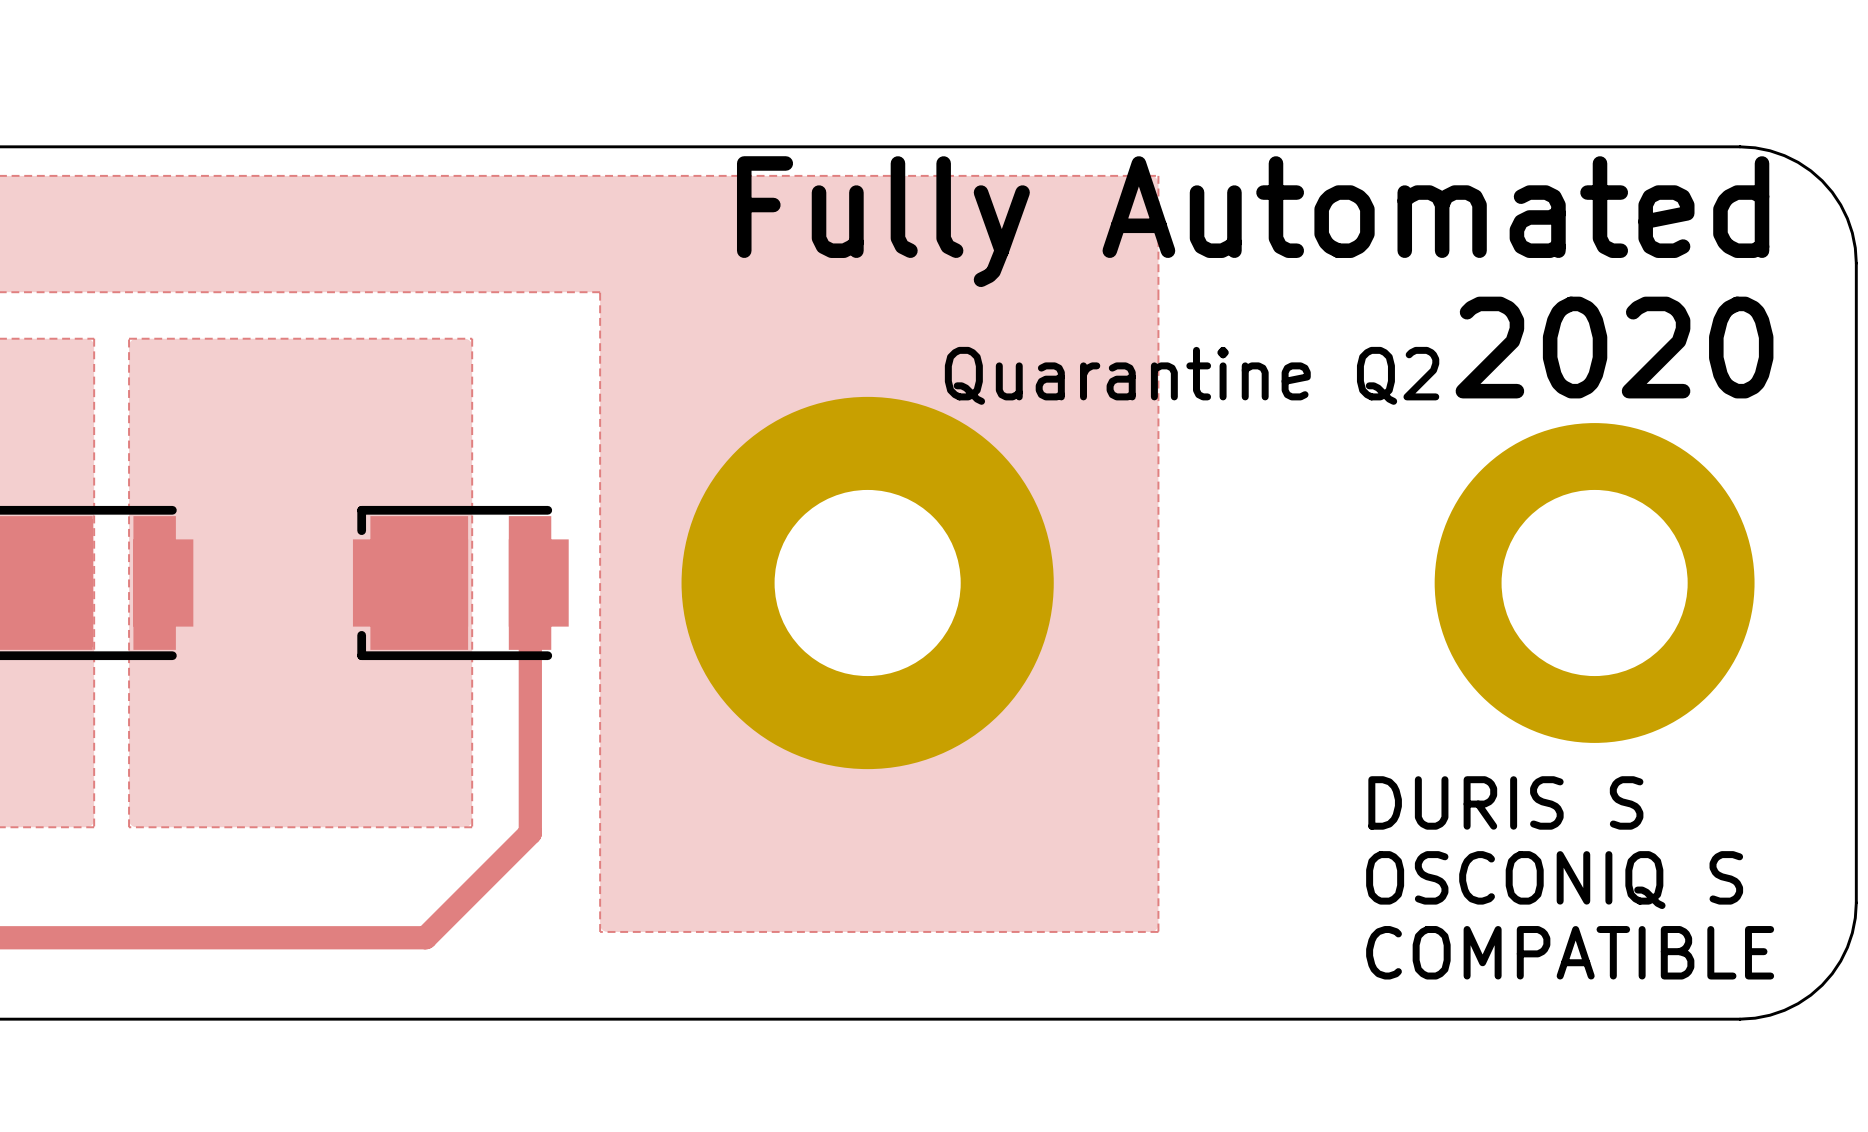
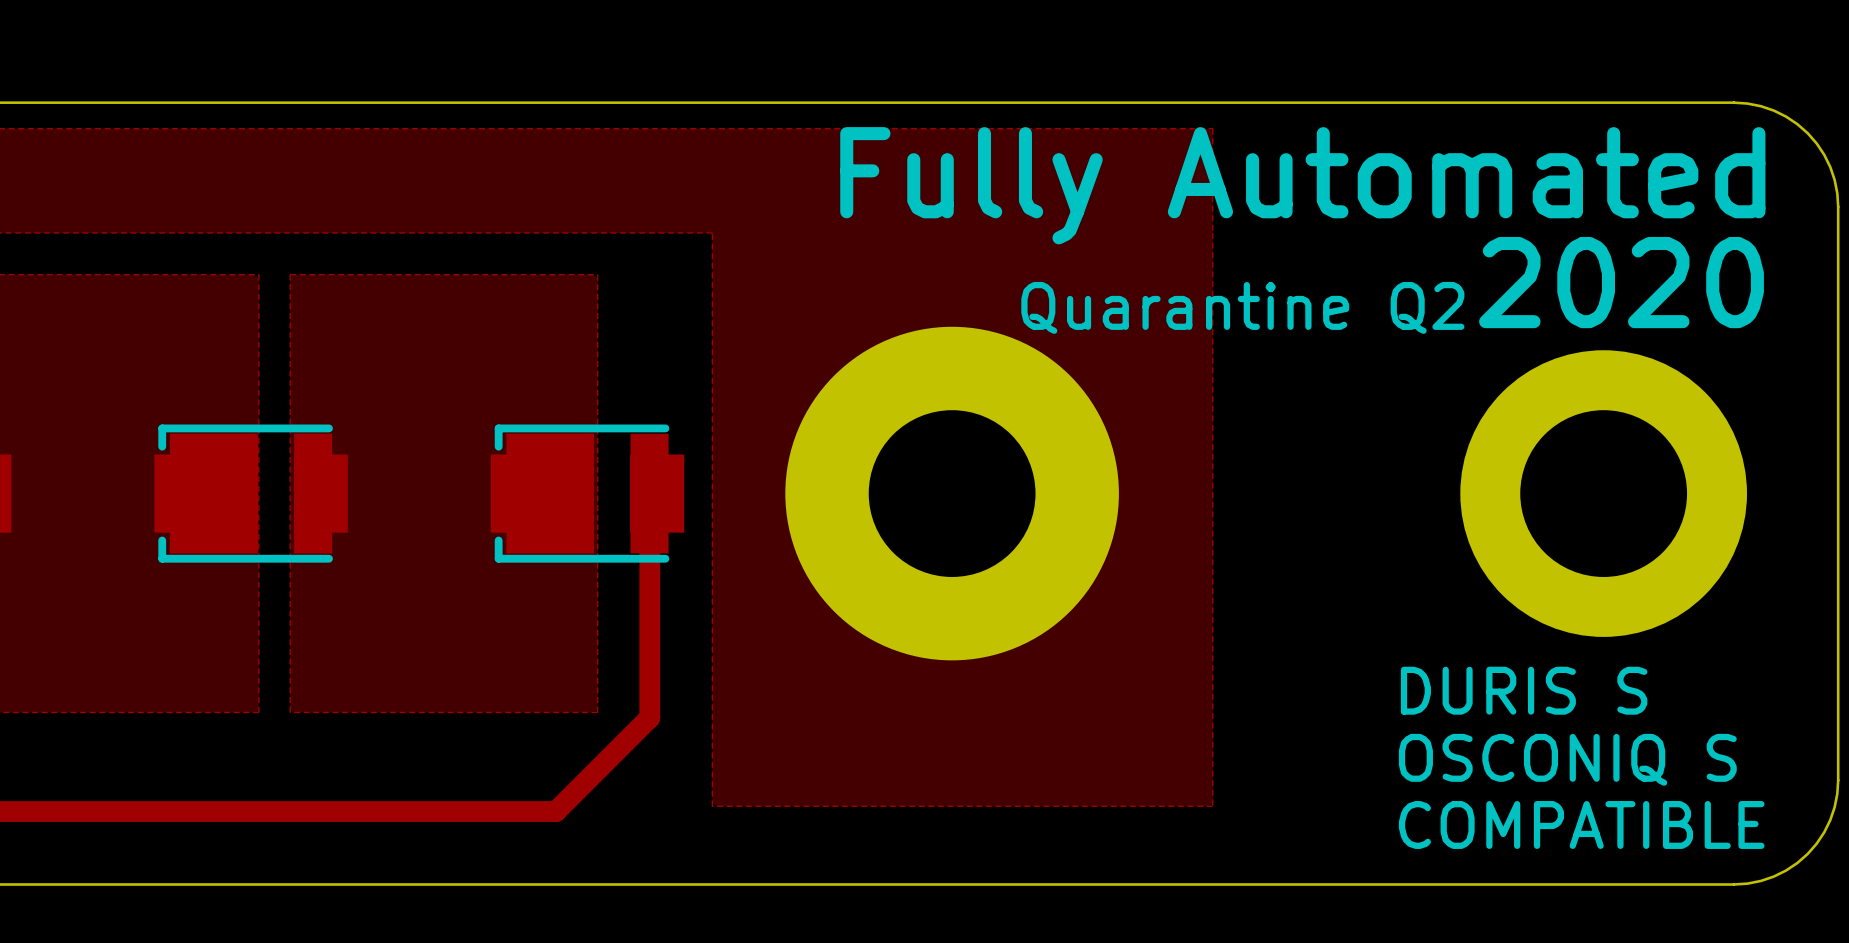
text position: Fully Automated (1253, 221) -> Fully Automated (1302, 185)

